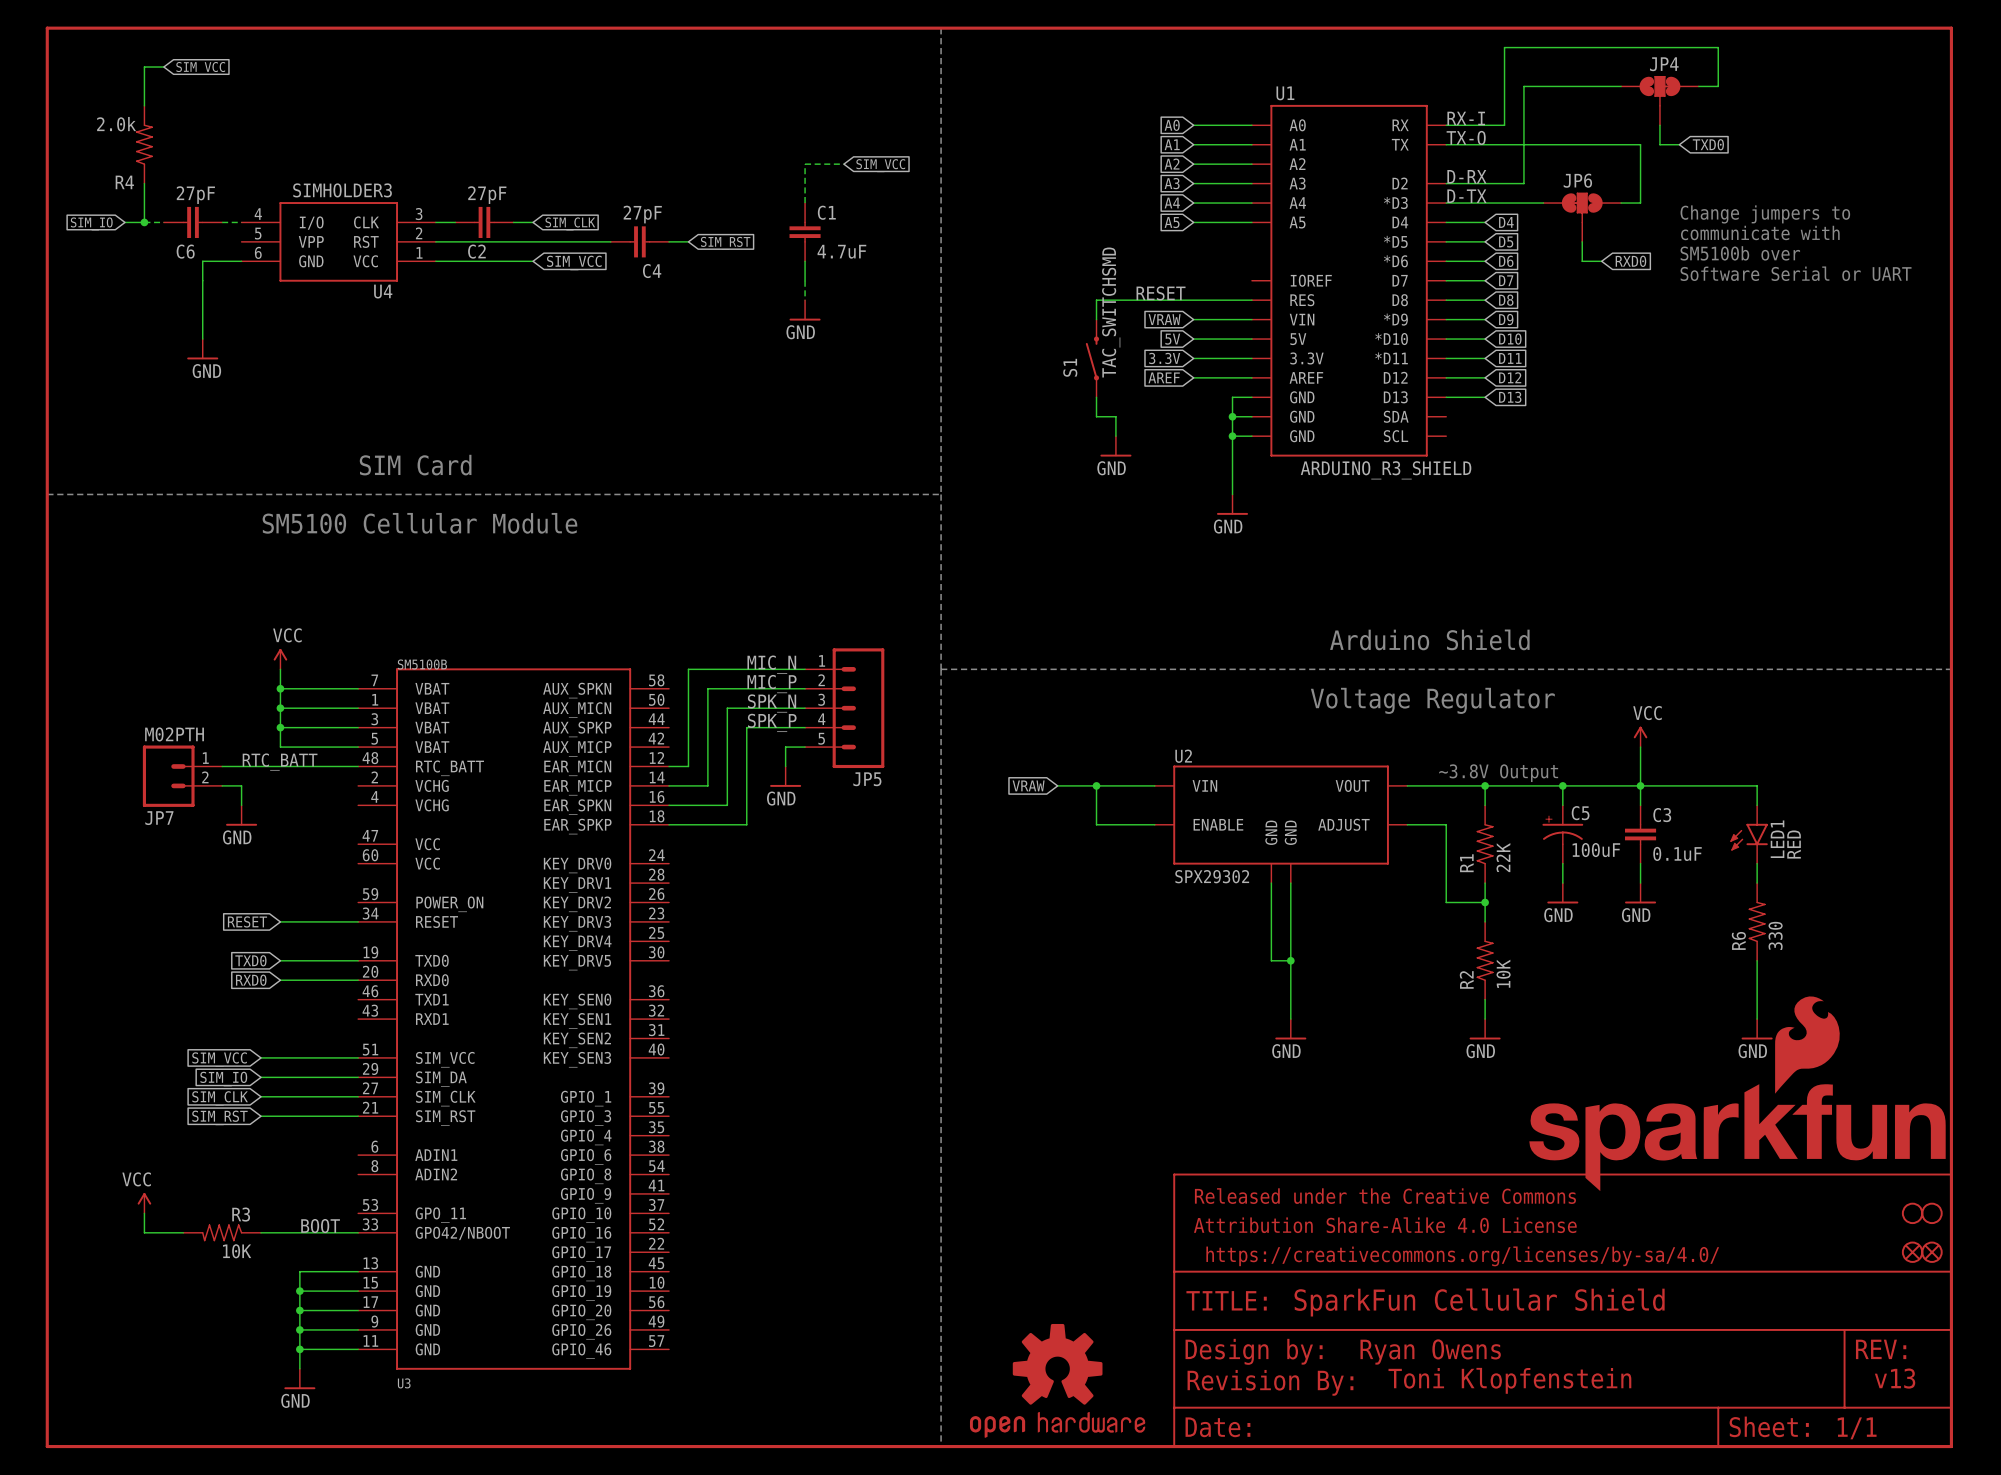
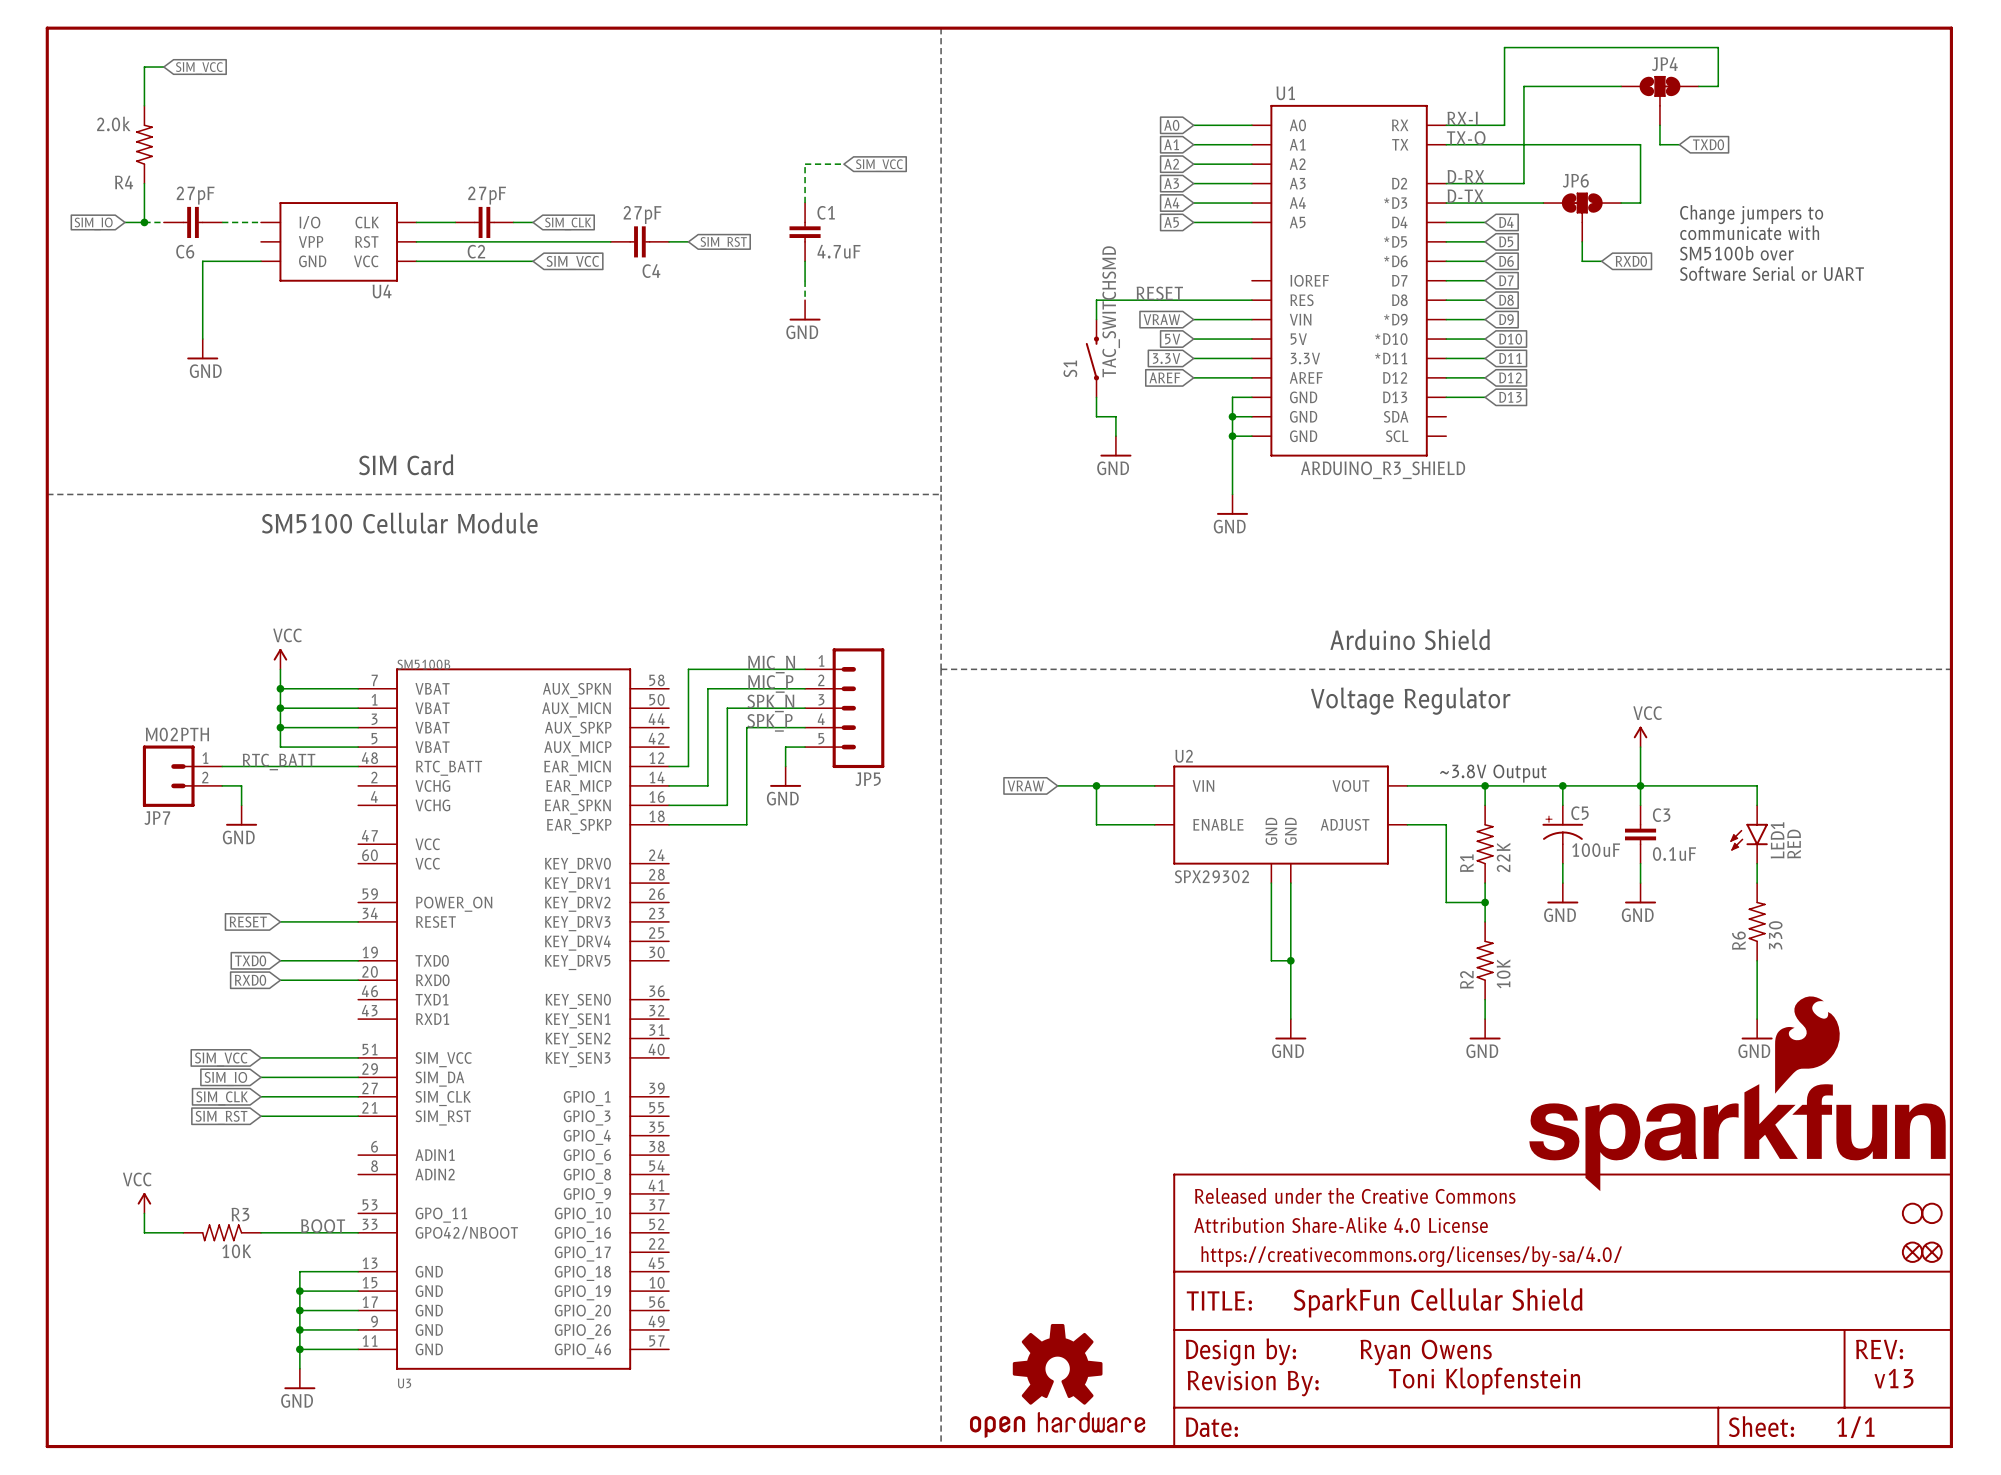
U4 value: SIMHOLDER3 (342, 190) -> none
U4 symbol: [241, 202, 436, 282] -> [261, 202, 417, 282]

